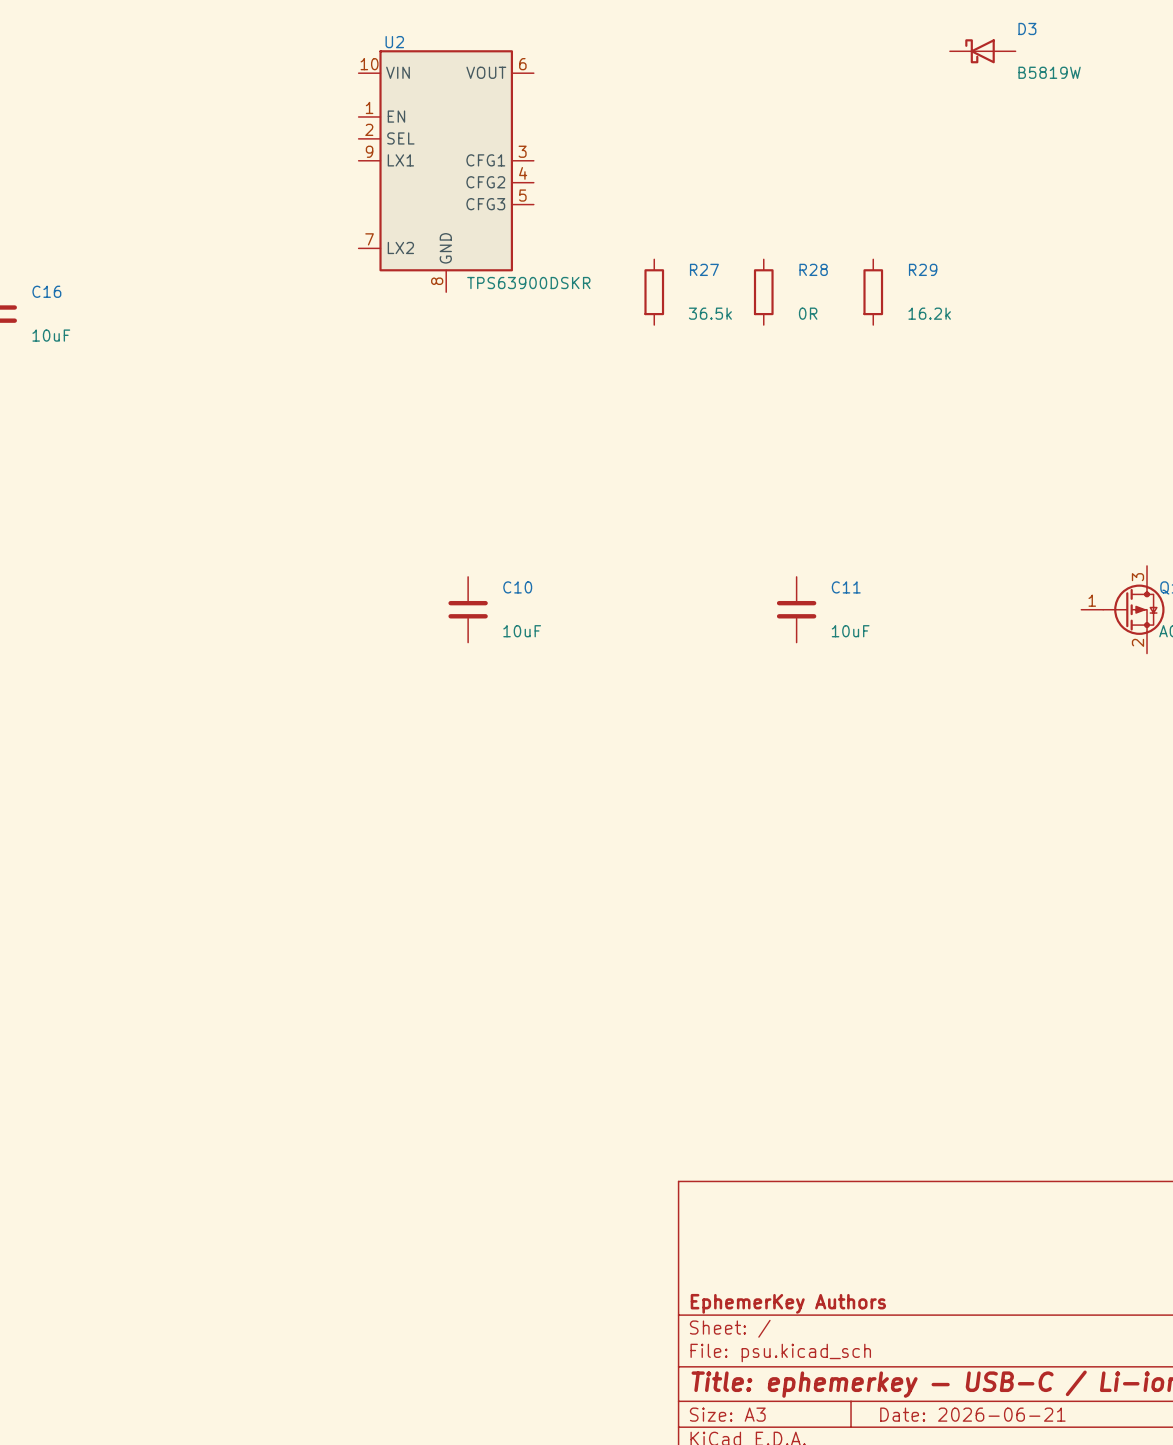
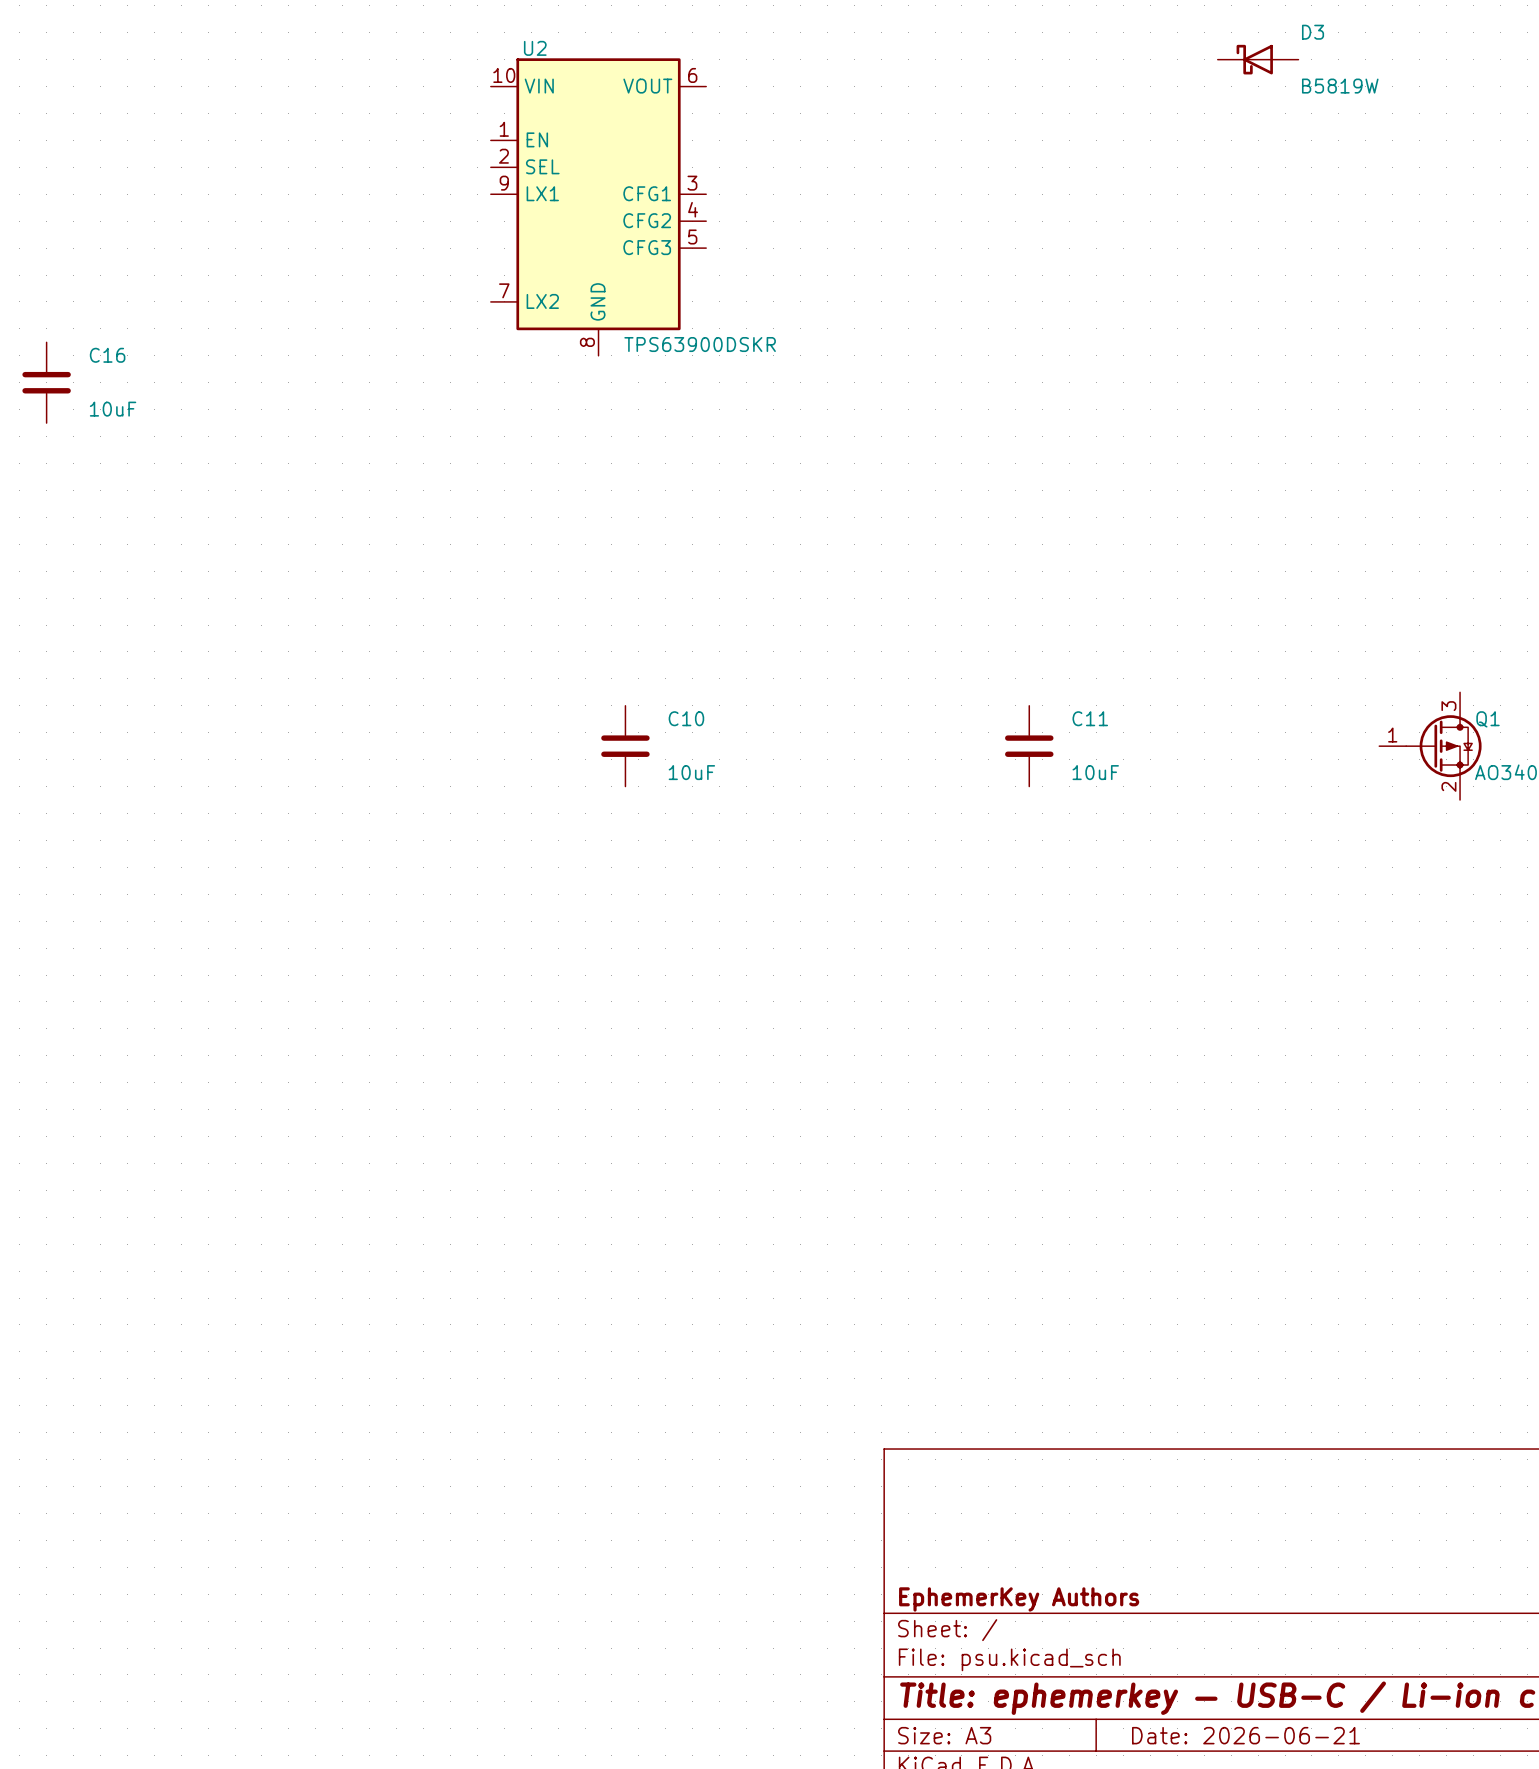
R27: 36.5k (654, 292) -> none
R28: 0R (763, 292) -> none
R29: 16.2k (873, 292) -> none

